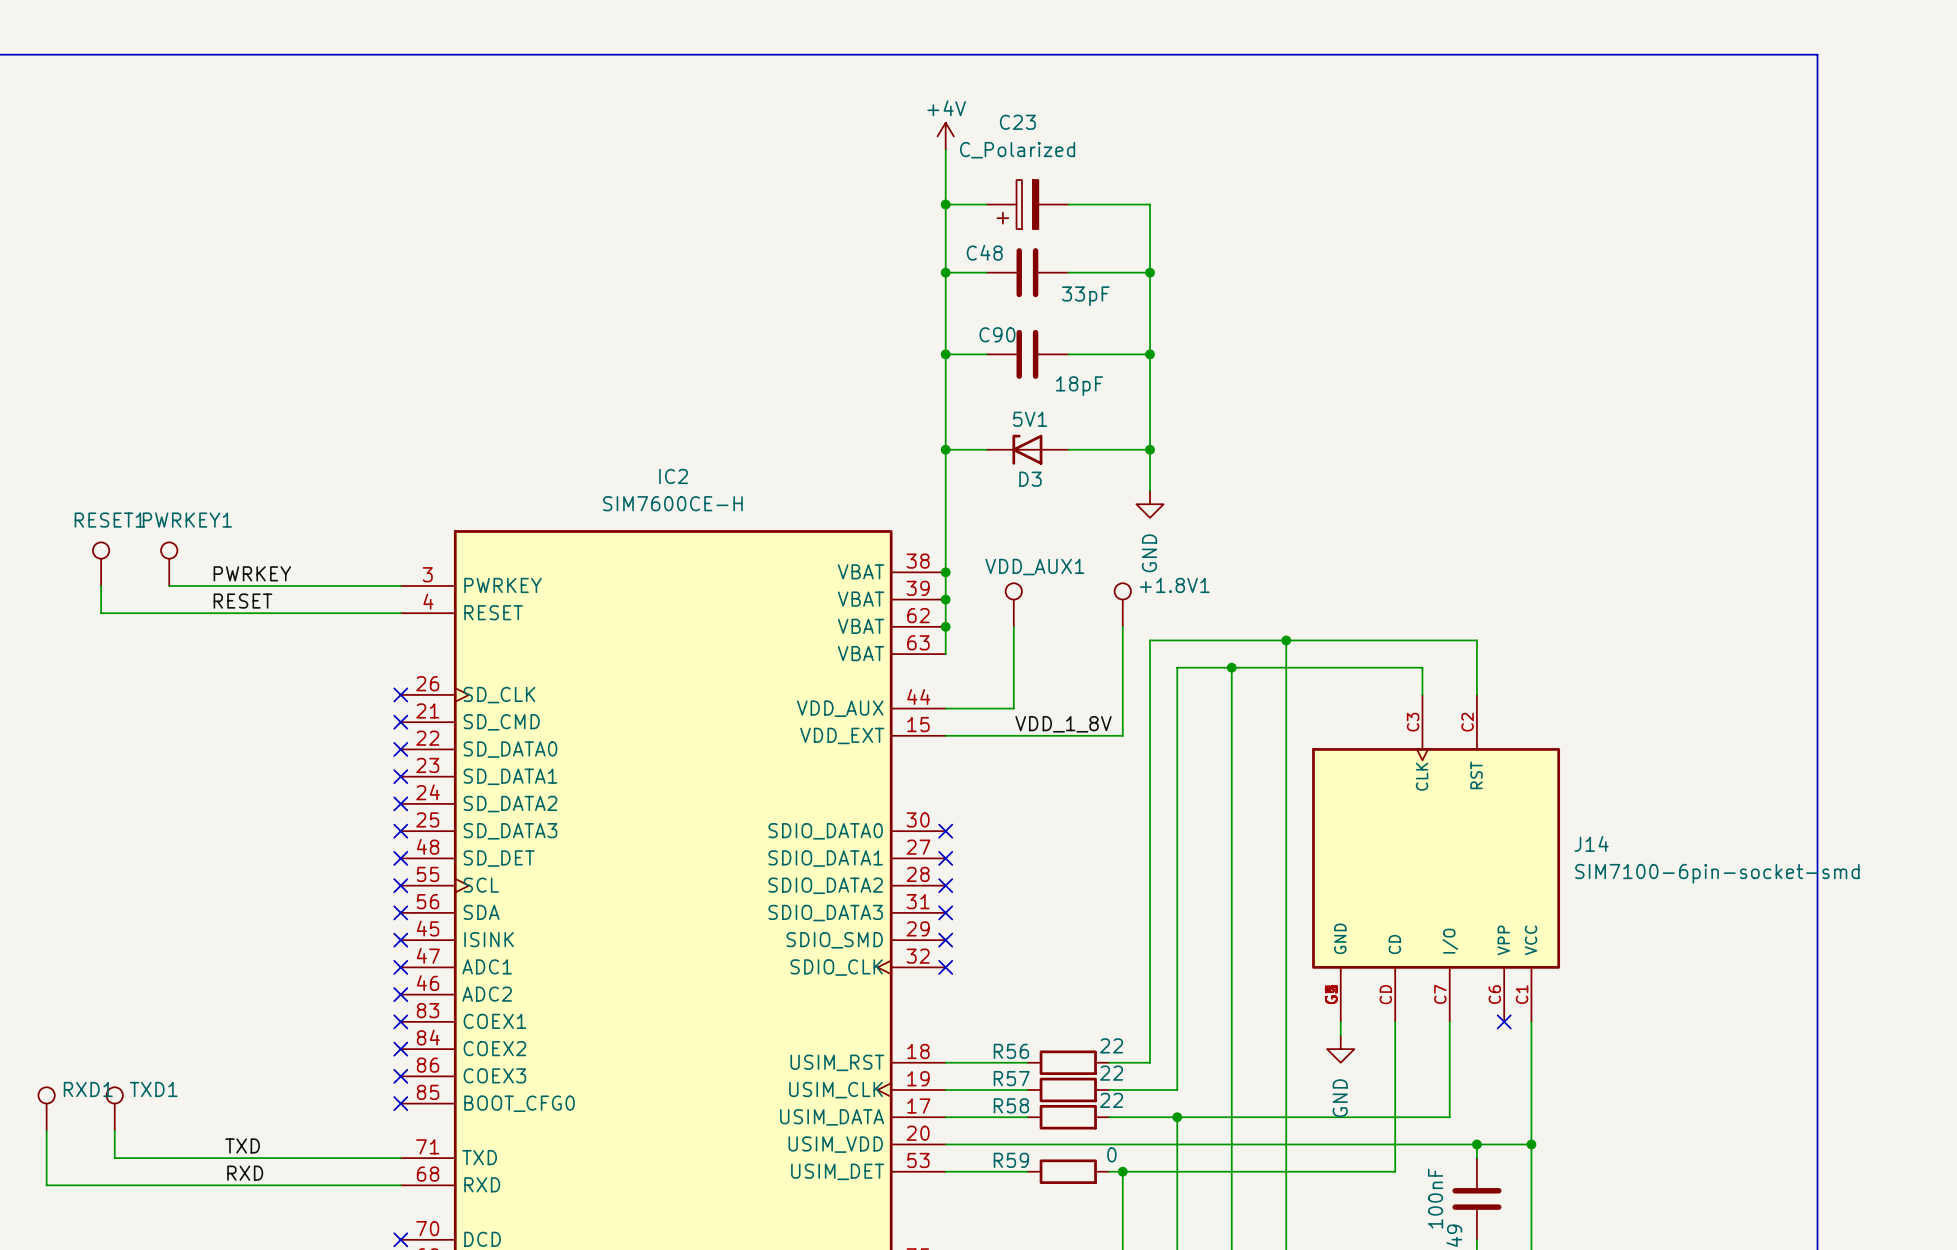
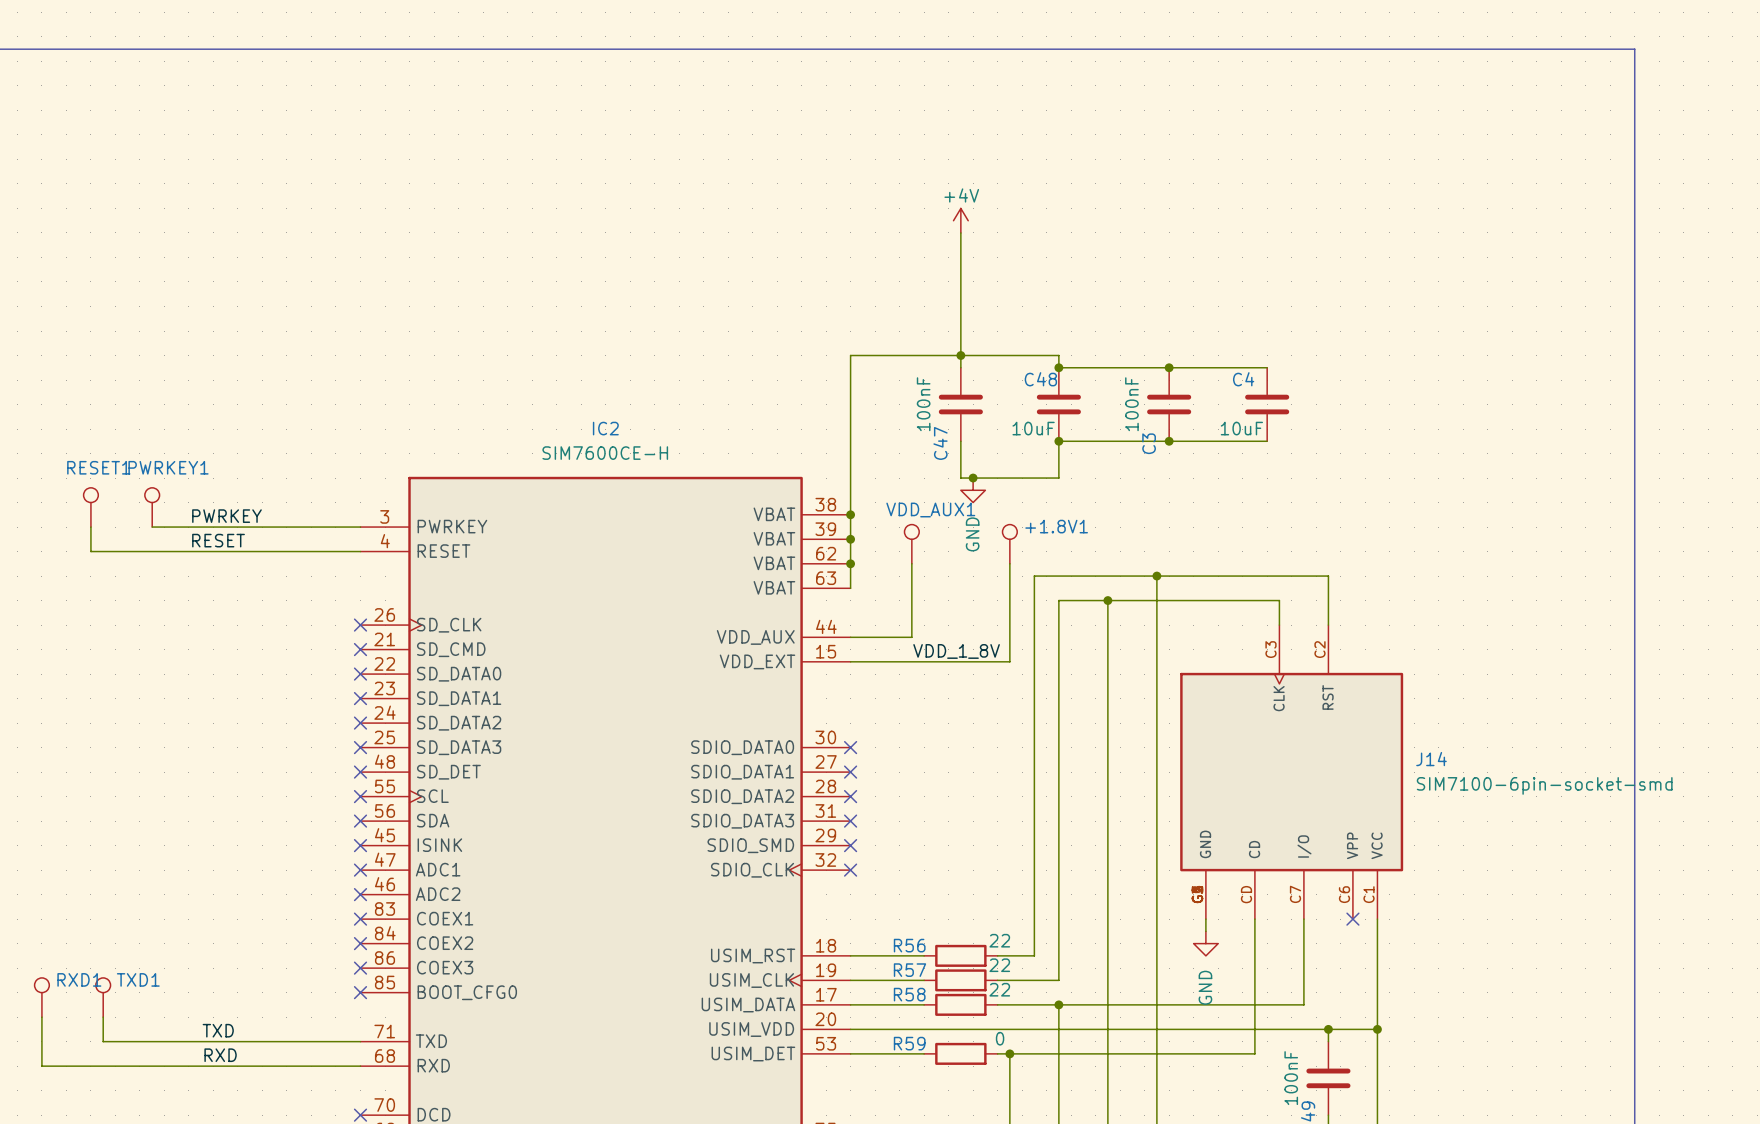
power symbol position: +4V (945, 136) -> +4V (960, 220)
wire: (945, 150) (945, 395) -> (1267, 367) (1058, 367) (1058, 355) (850, 355)
wire: (945, 204) (986, 204) -> none
junction: (945, 204) -> none
C23: C_Polarized (1027, 204) -> none
wire: (1068, 204) (1150, 204) (1150, 490) -> none
C48 name position: C48 (984, 252) -> C48 (1040, 379)
wire: none -> (960, 232) (960, 367)
wire: (945, 272) (986, 272) -> none
junction: (945, 272) -> none
C48 rotation: 0° (1027, 272) -> 90° clockwise (1058, 404)
C48 position: (1027, 272) -> (1058, 404)
wire: (1068, 272) (1150, 272) -> none
junction: (1150, 272) -> none
C48 value: 33pF (1085, 296) -> 10uF (1033, 428)
wire: (945, 354) (986, 354) -> none
junction: (945, 354) -> none
C90: 18pF (1027, 354) -> none
wire: (1068, 354) (1150, 354) -> none
junction: (1150, 354) -> none
junction: none -> (960, 355)
junction: none -> (1058, 367)
junction: none -> (1169, 367)
wire: (945, 449) (986, 449) -> none
junction: (945, 449) -> none
D3: 5V1 (1027, 449) -> none
wire: (1068, 449) (1150, 449) -> none
C47: none -> 100nF (960, 404)
junction: (1150, 449) -> none
C3: none -> 100nF (1169, 404)
C4: none -> 10uF (1267, 404)
wire: none -> (960, 441) (960, 478) (1058, 478) (1058, 441) (1267, 441)
junction: none -> (1058, 441)
junction: none -> (1169, 441)
power symbol position: GND (1150, 504) -> GND (973, 490)
junction: none -> (973, 478)

